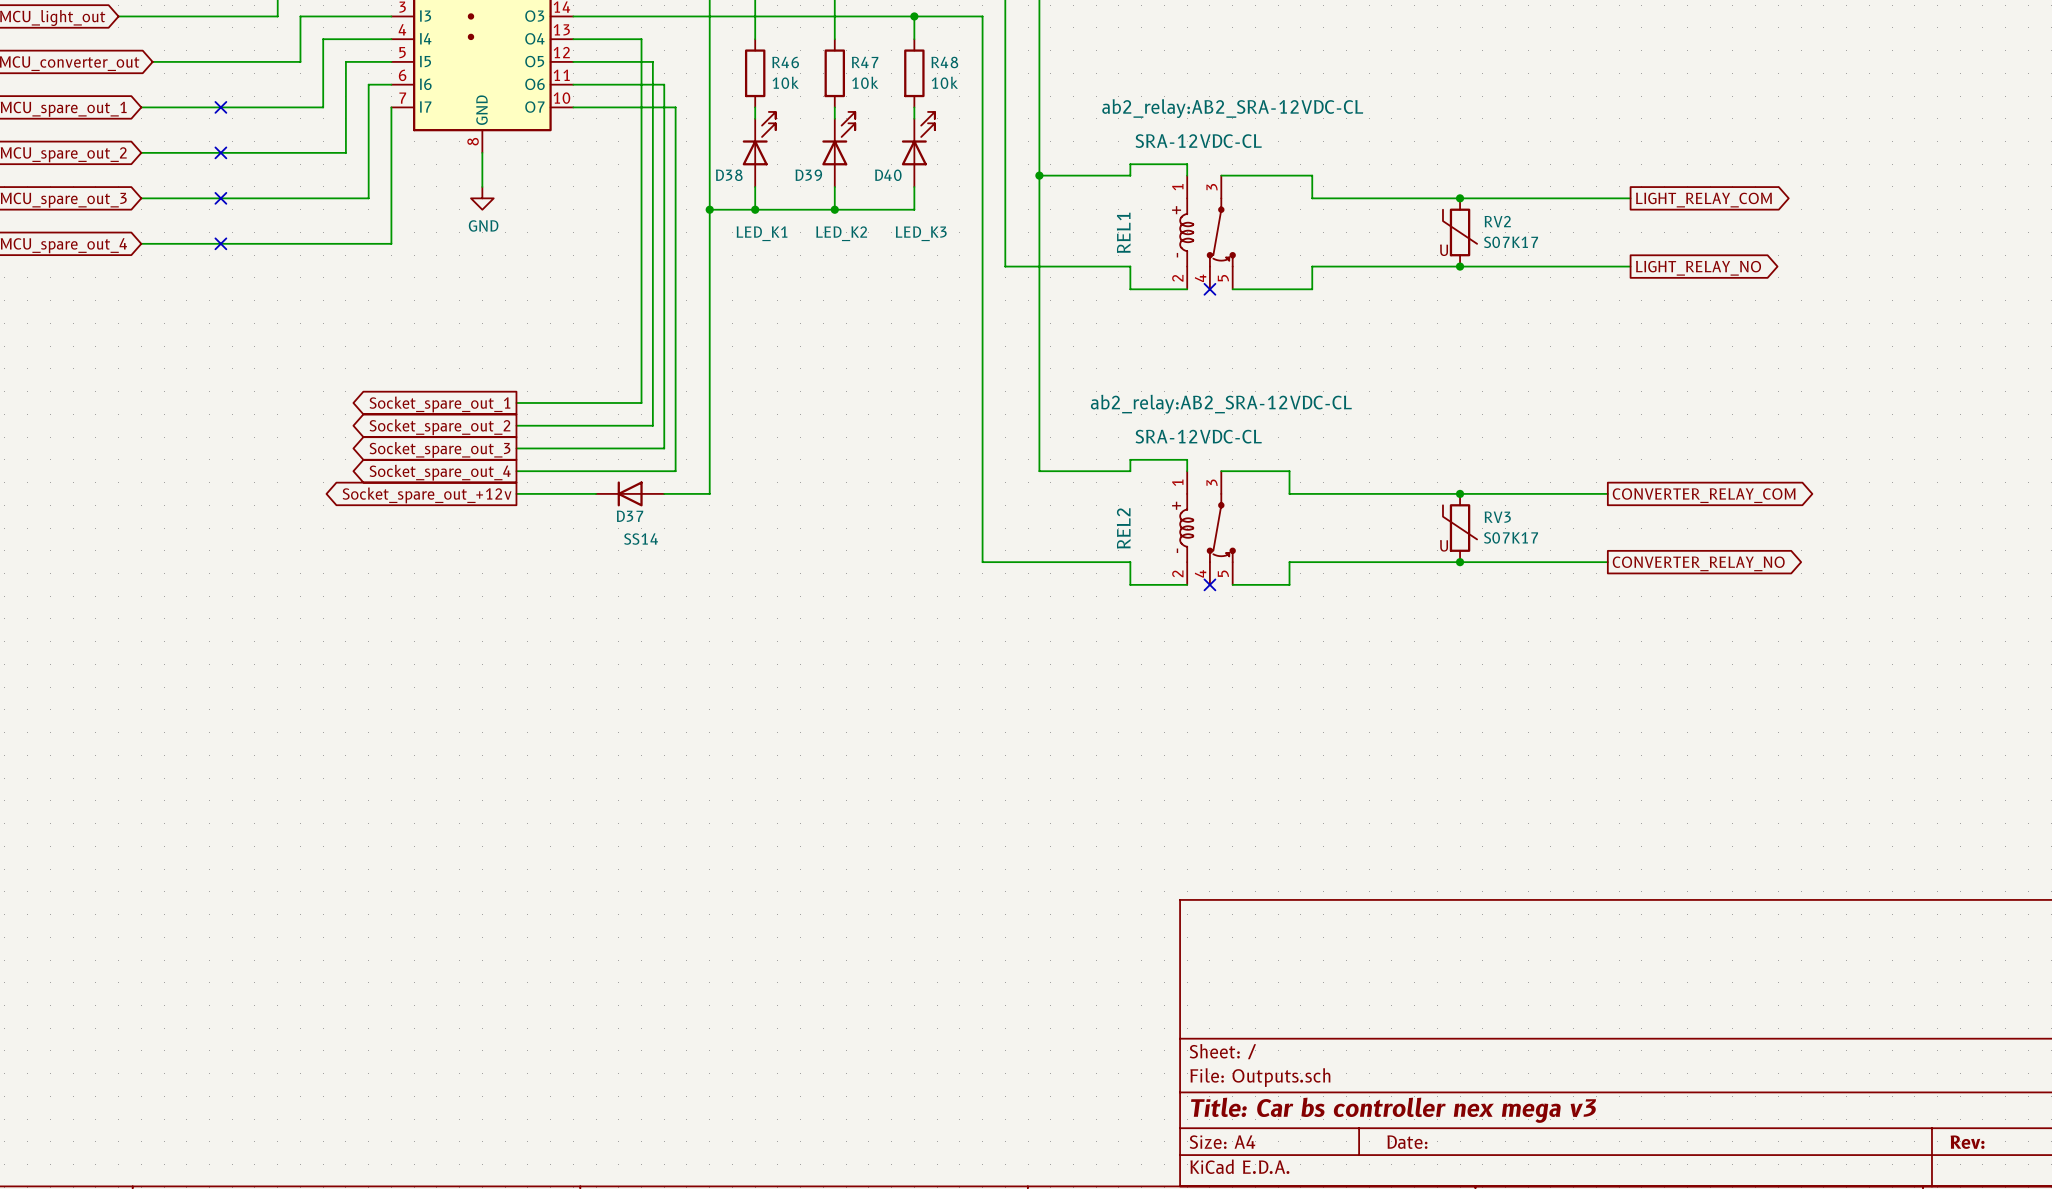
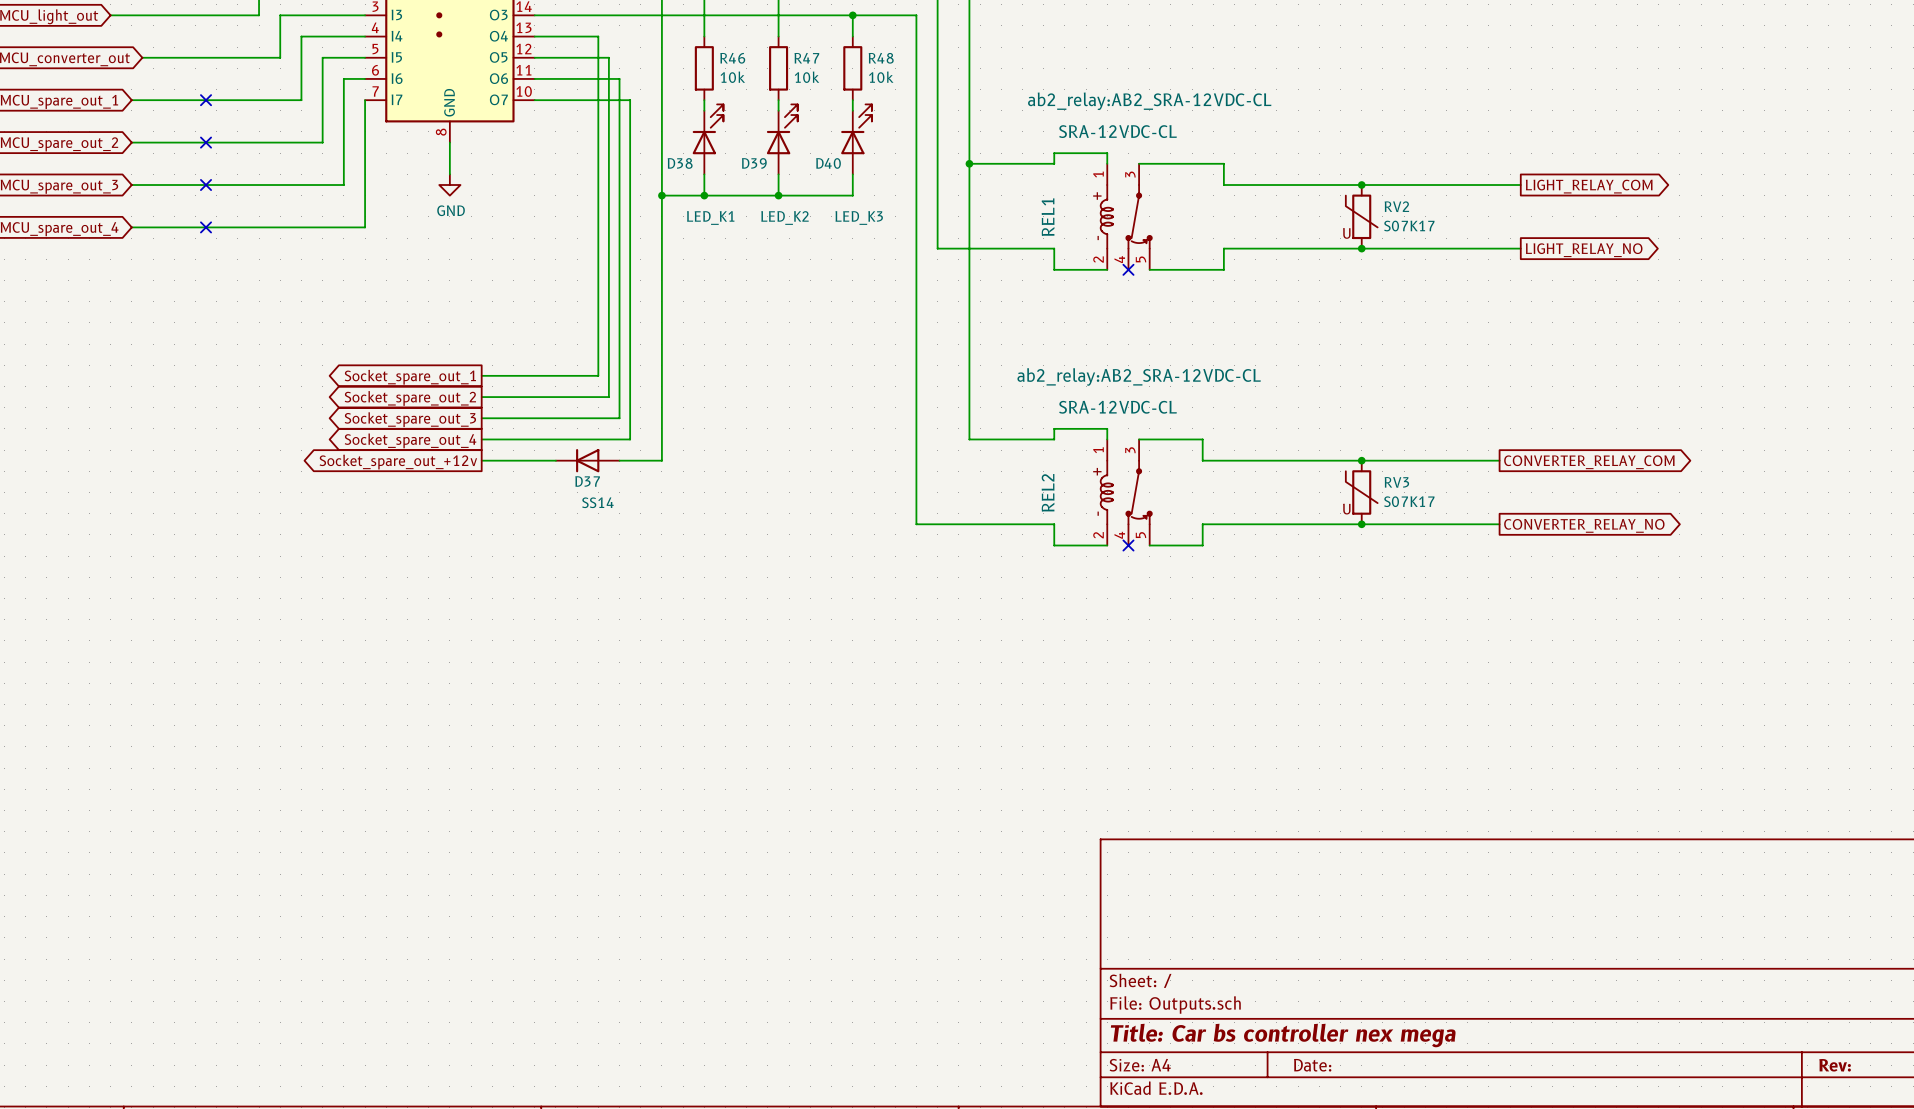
title block: Title: Car bs controller nex mega v3 (1393, 1110) -> Title: Car bs controller nex mega (1283, 1035)

